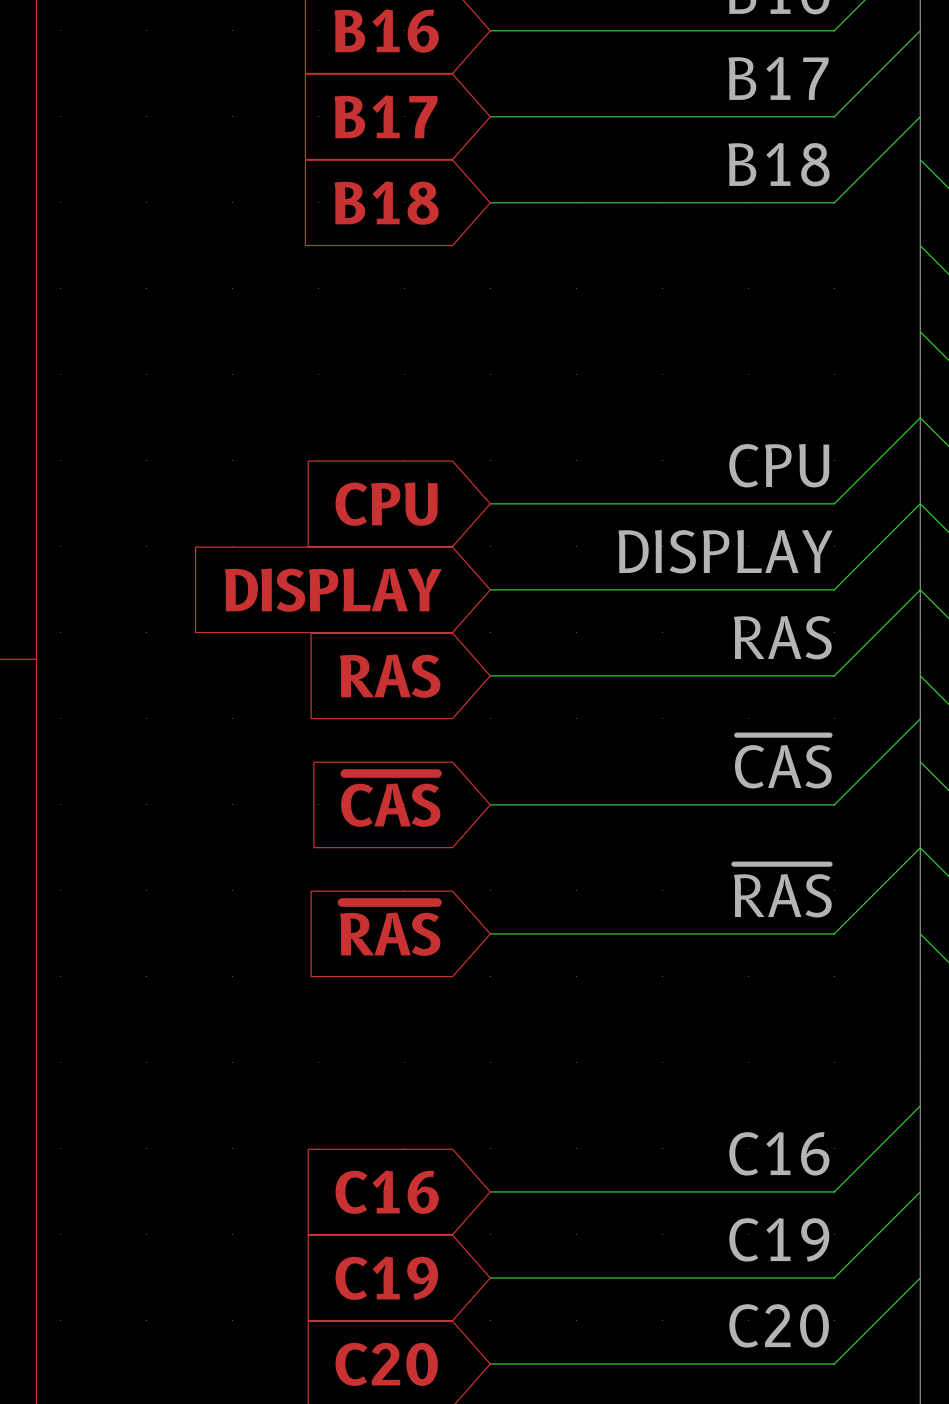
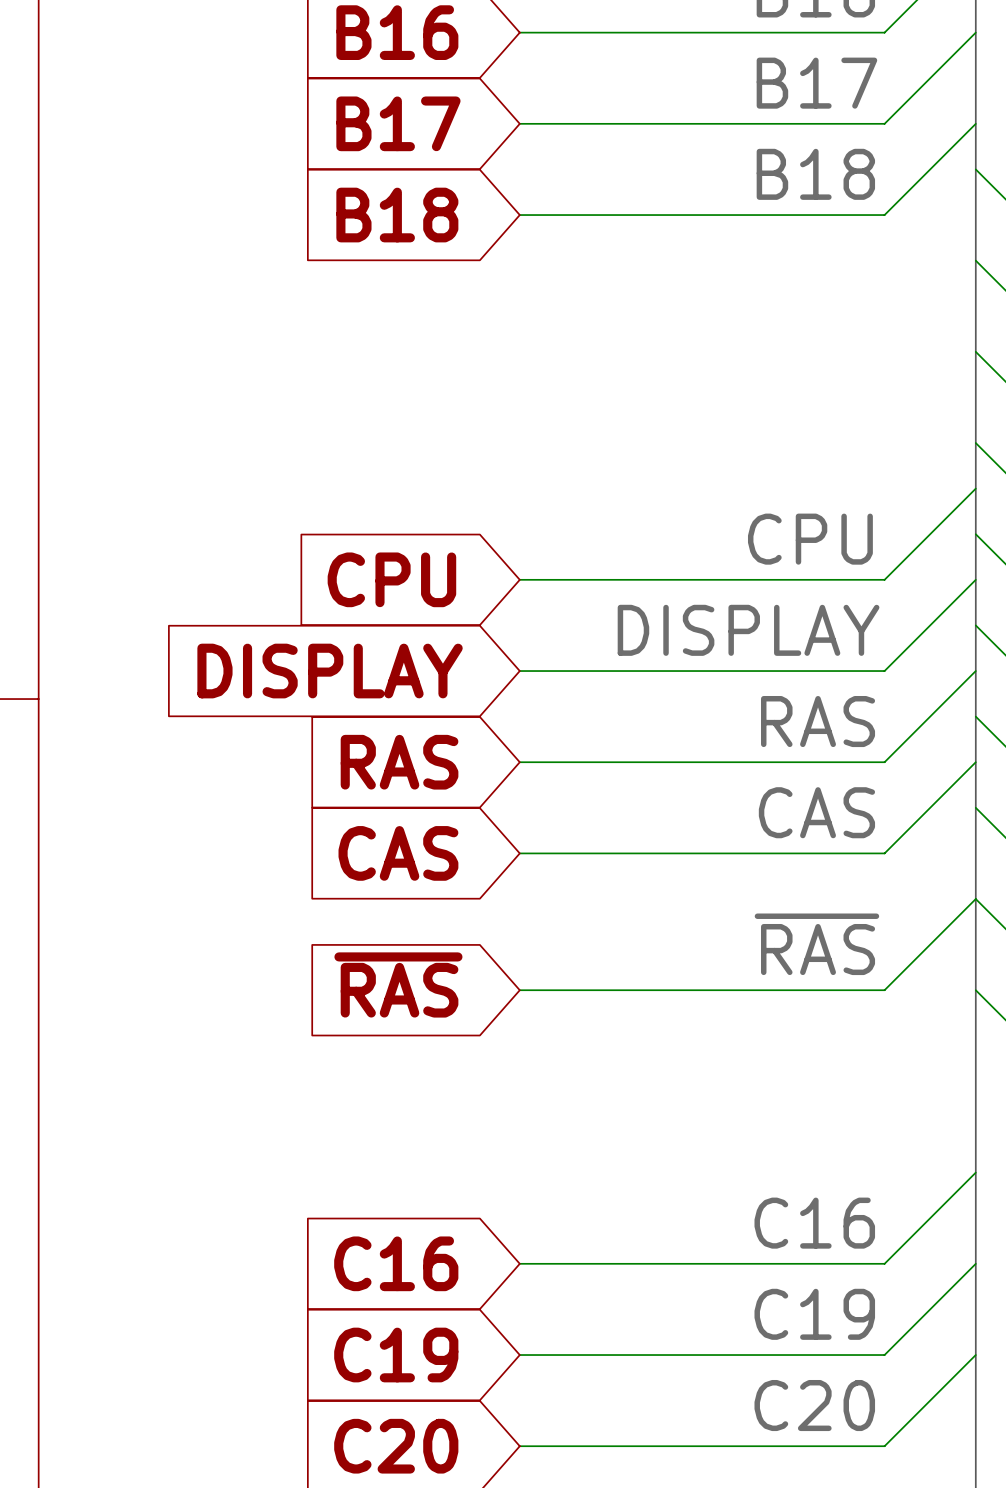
wire: (920, 417) (834, 503) (490, 503) -> (975, 488) (884, 579) (519, 579)
label position: CPU (779, 465) -> CPU (810, 539)
wire: (920, 503) (834, 589) (490, 589) -> (975, 579) (884, 671) (519, 671)
global label position: CPU (386, 504) -> CPU (391, 579)
label position: DISPLAY (725, 551) -> DISPLAY (748, 630)
wire: (920, 589) (834, 675) (490, 675) -> (975, 671) (884, 762) (519, 762)
global label position: DISPLAY (333, 590) -> DISPLAY (330, 671)
label position: RAS (782, 637) -> RAS (818, 721)
global label position: RAS (390, 676) -> RAS (399, 762)
label: ~{CAS} (783, 761) -> CAS (816, 812)
global label: ~{CAS} (390, 800) -> CAS (398, 853)

